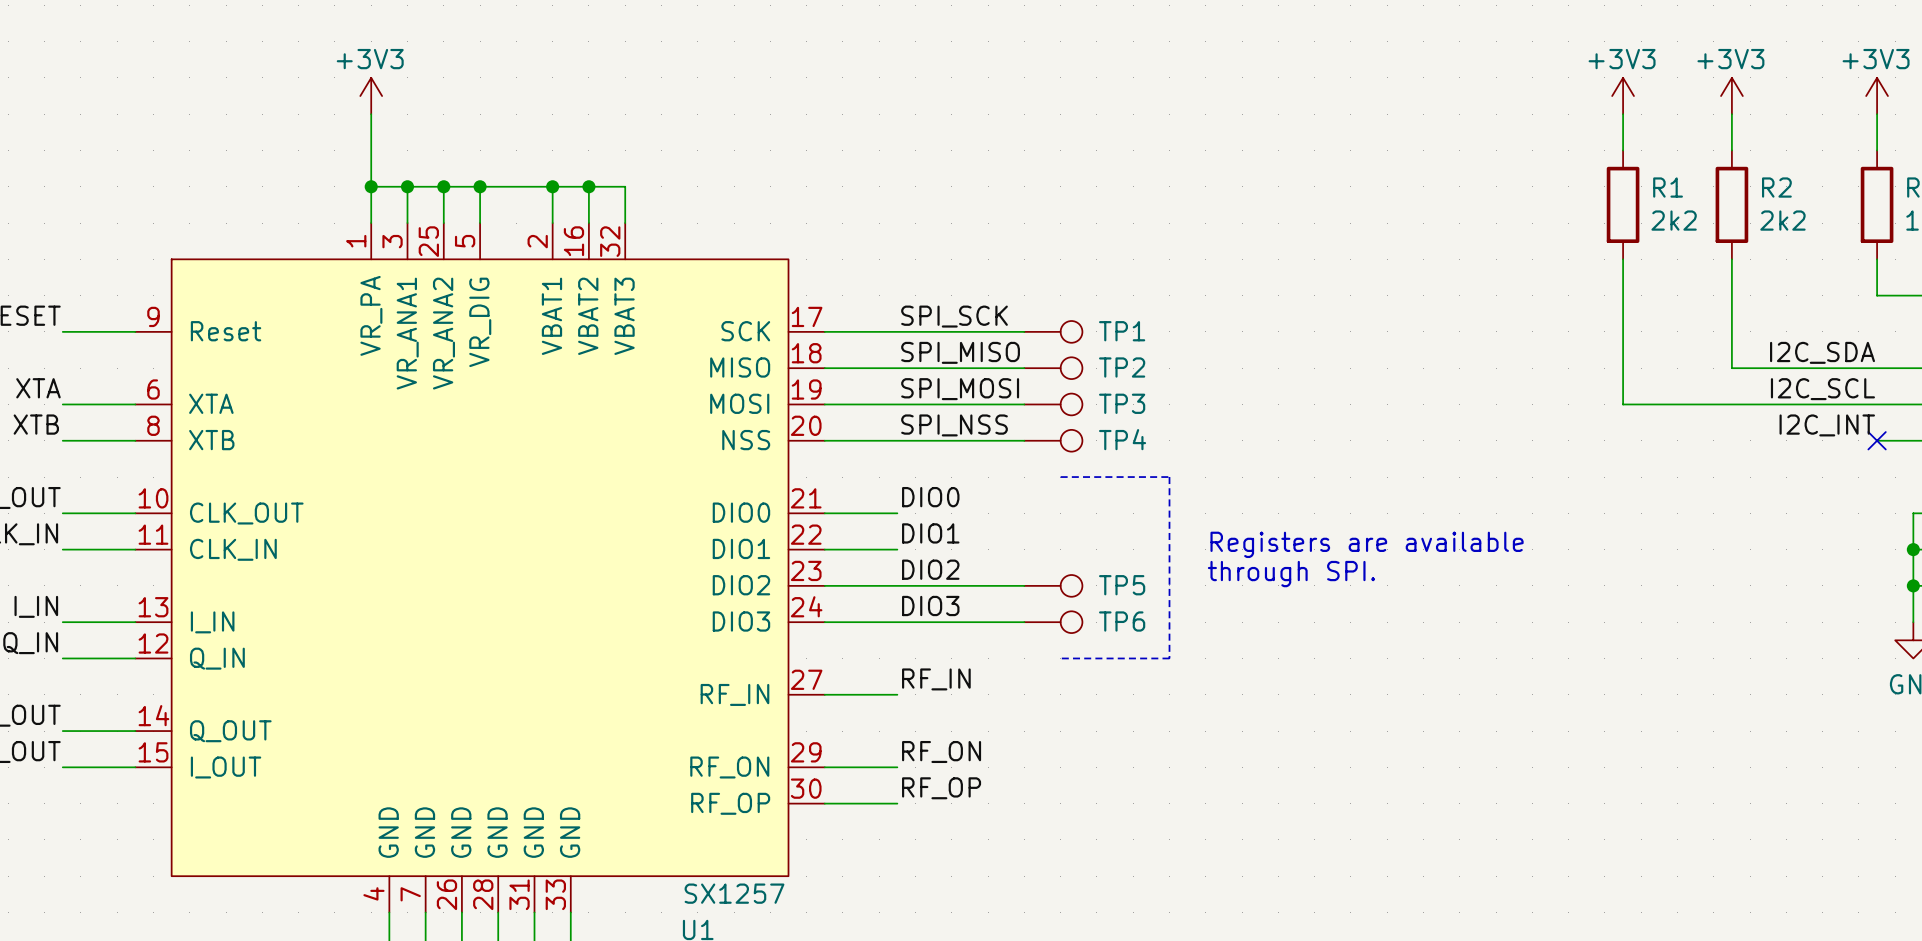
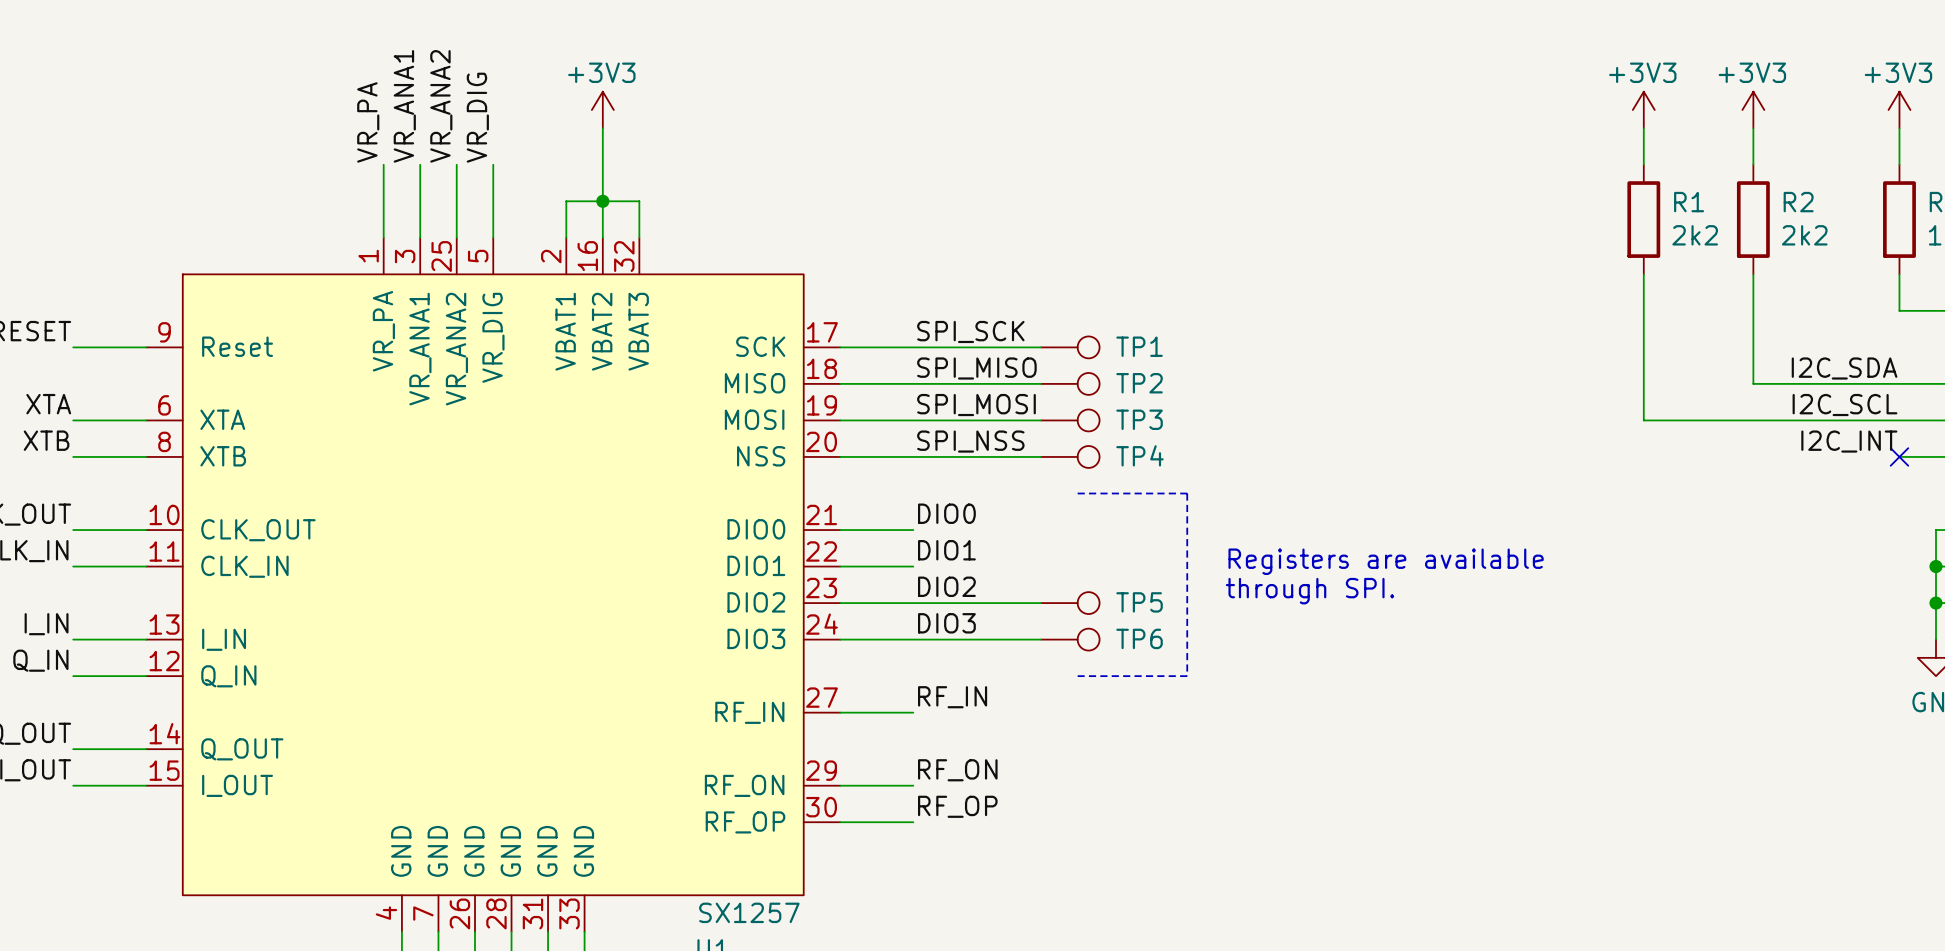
label: none -> VR_ANA1 (404, 106)
label: none -> VR_ANA2 (441, 106)
power symbol position: +3V3 (371, 96) -> +3V3 (602, 109)
label: none -> VR_DIG (477, 117)
label: none -> VR_PA (368, 122)
wire: (371, 114) (371, 150) -> (420, 164) (420, 201)
wire: none -> (602, 128) (602, 201)
wire: none -> (456, 164) (456, 201)
wire: none -> (493, 164) (493, 201)
wire: (371, 186) (552, 186) -> none
junction: (371, 186) -> none
junction: (407, 186) -> none
junction: (443, 186) -> none
junction: (480, 186) -> none
junction: (552, 186) -> none

